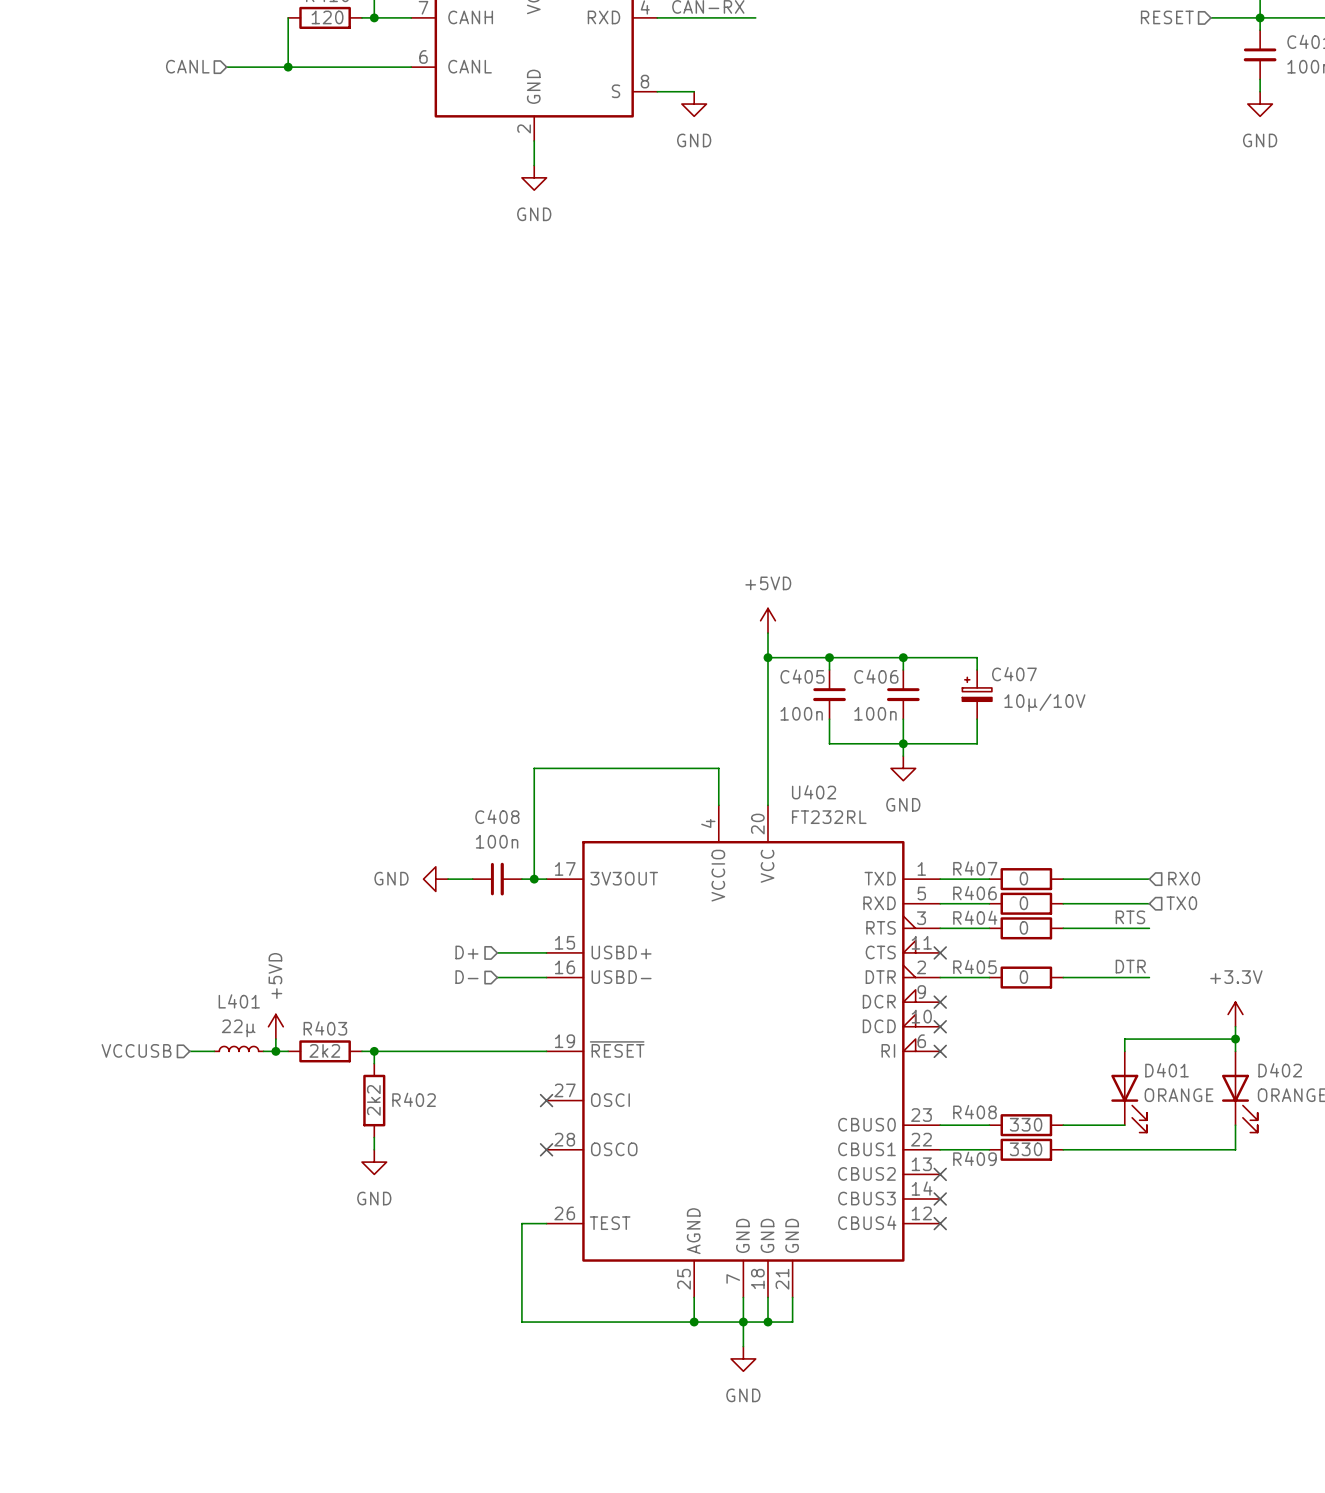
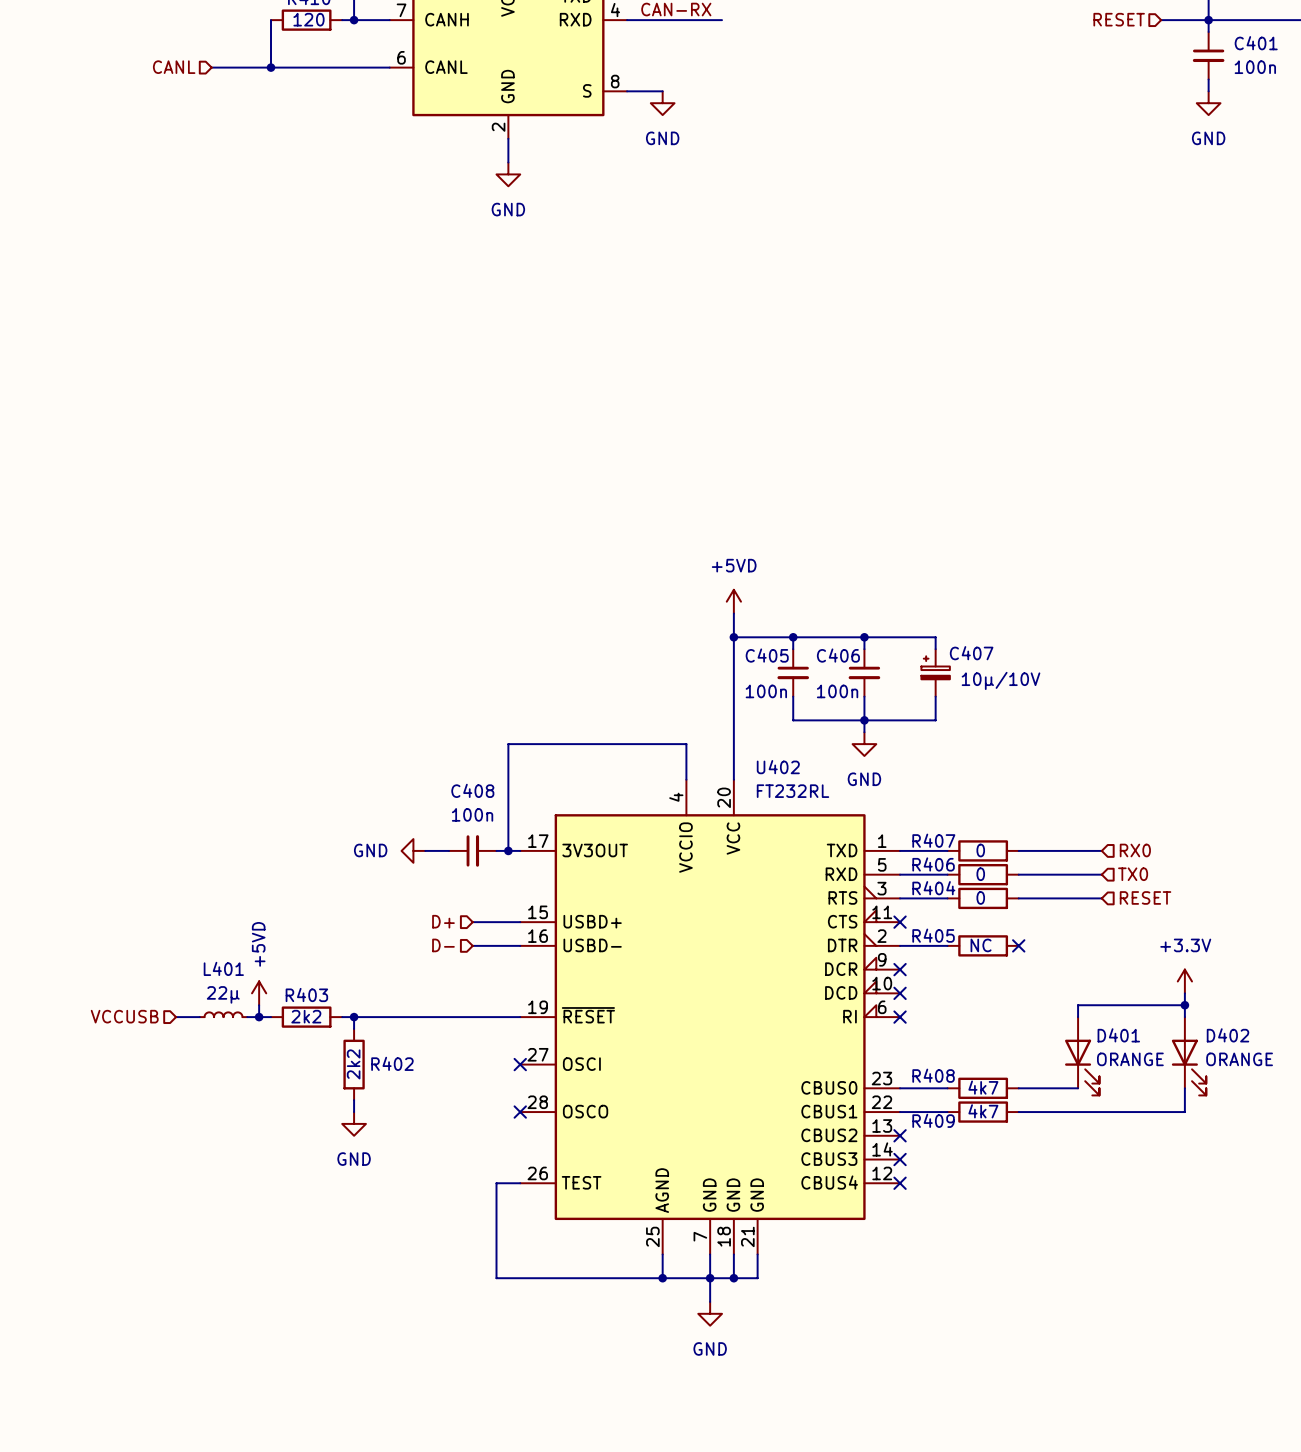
label: RTS (1130, 917) -> none
hierarchical label: none -> RESET (1145, 897)
label: DTR (1130, 966) -> none
R405 value: 0 (1023, 977) -> NC (981, 945)
wire: (1063, 977) (1149, 977) -> none
no-connect mark: none -> (1018, 945)
R408 value: 330 (1026, 1124) -> 4k7 (983, 1087)
R409 value: 330 (1026, 1149) -> 4k7 (983, 1111)

